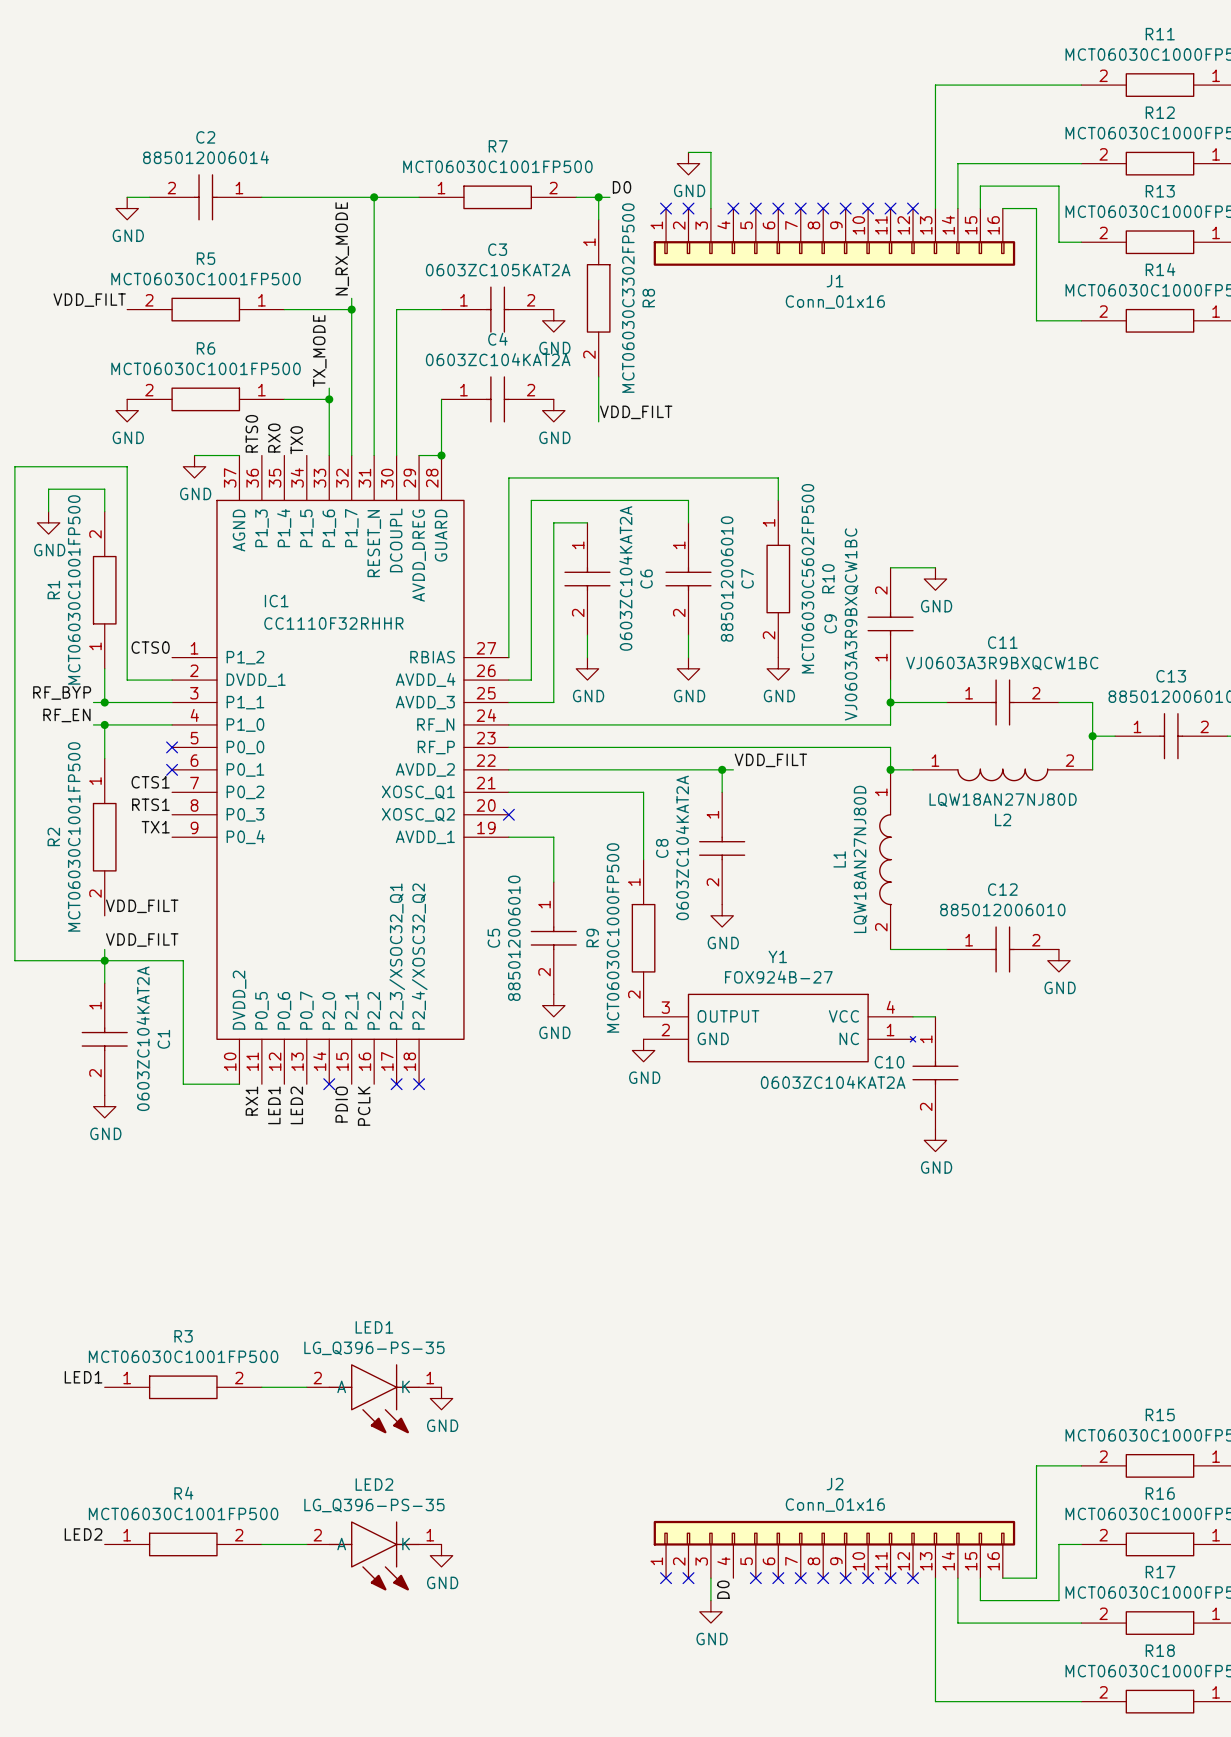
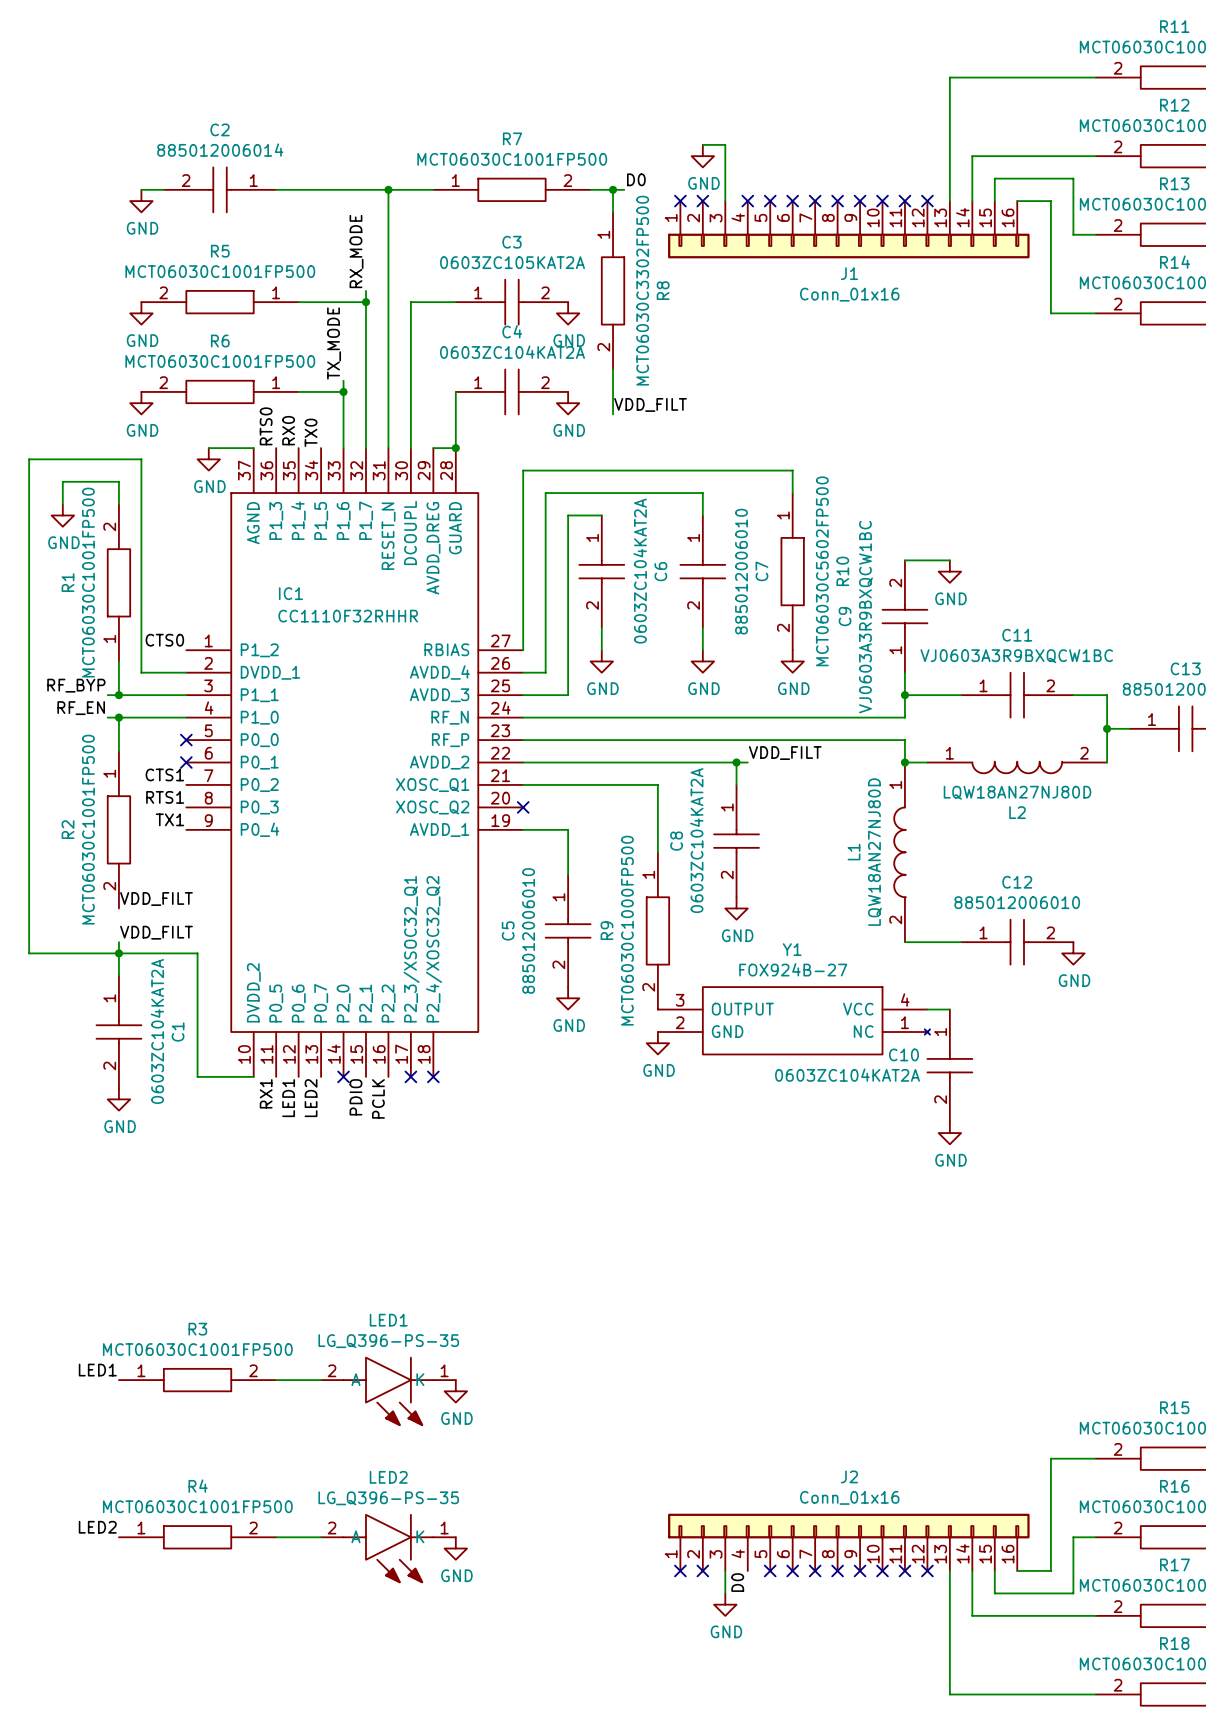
label: N_RX_MODE (342, 248) -> RX_MODE (356, 251)
label: VDD_FILT (89, 300) -> none
power symbol: none -> GND (141, 313)

